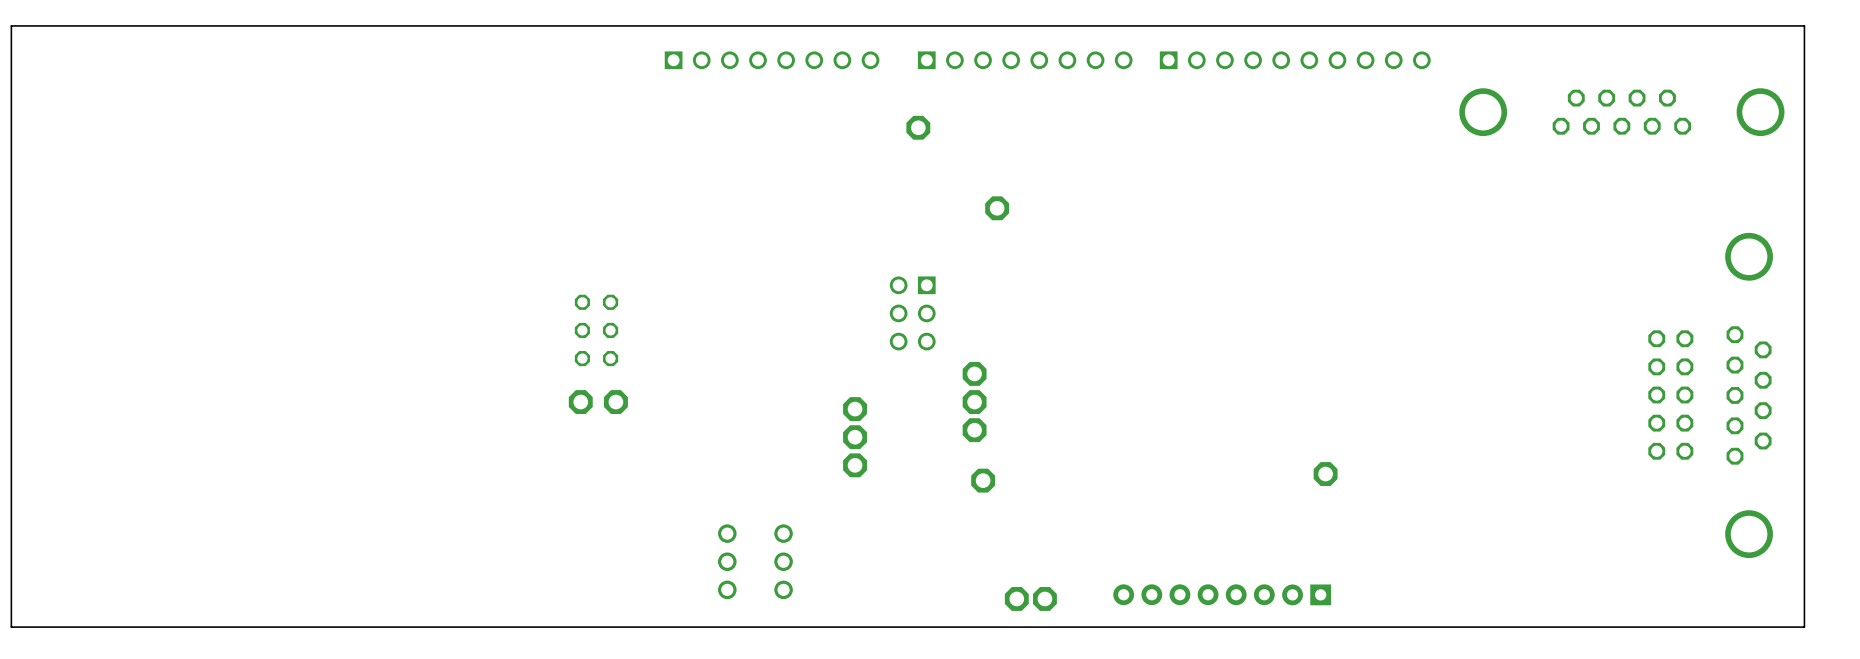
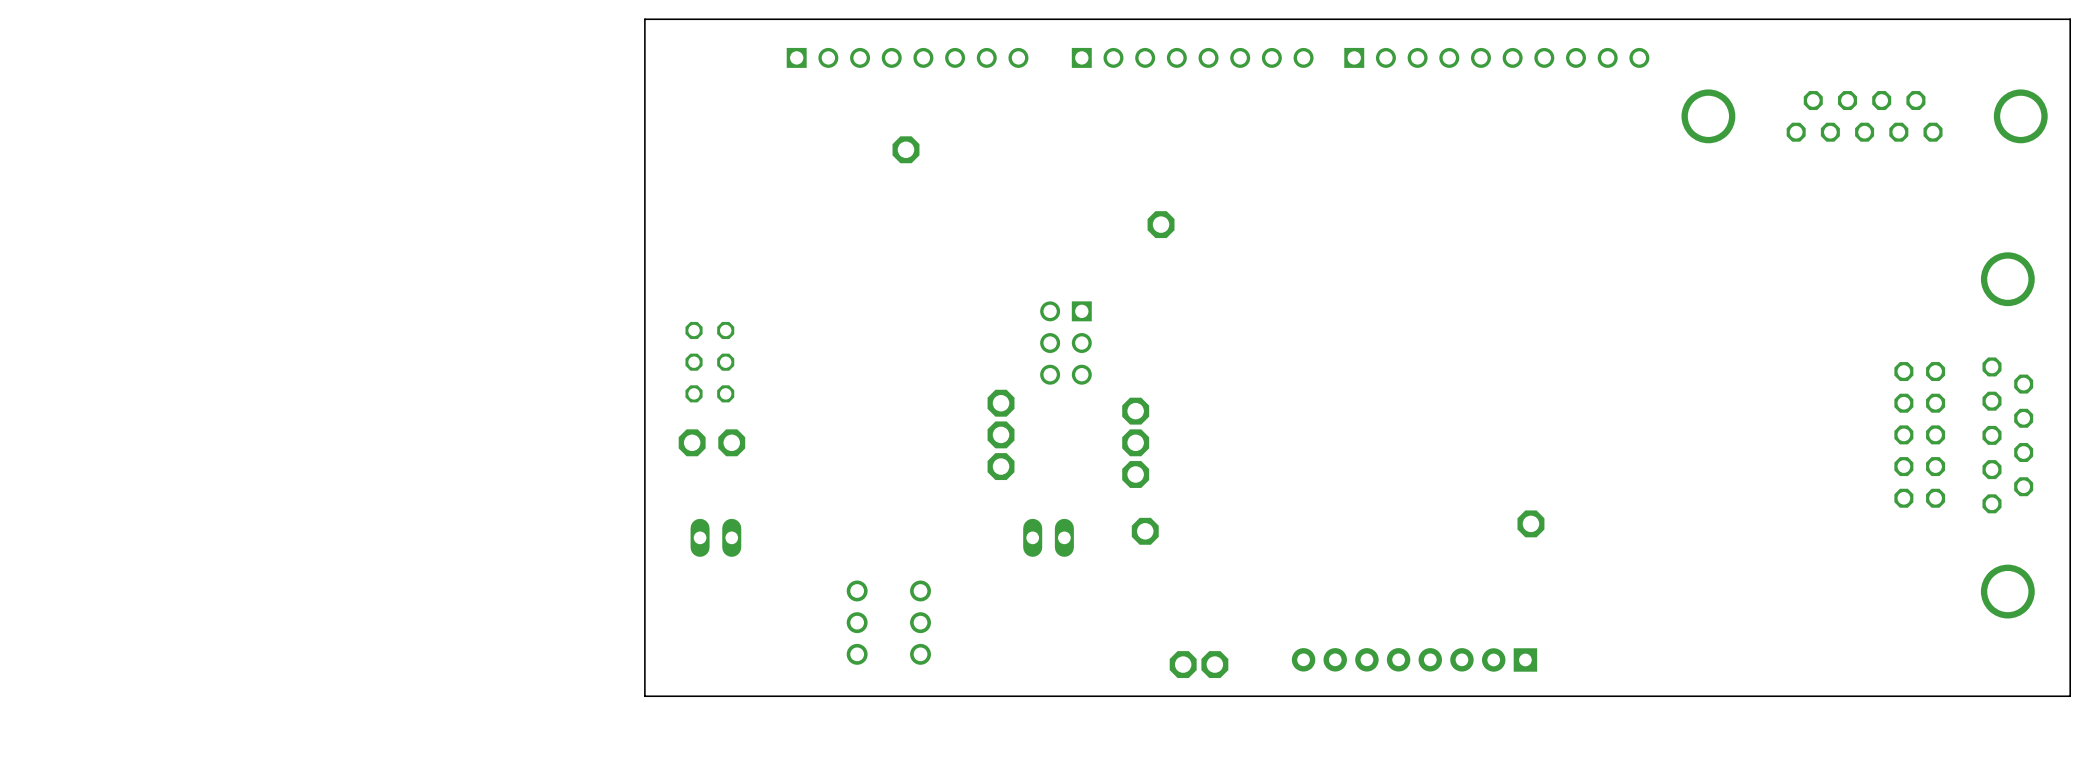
board edge: (538, 25) (11, 25) (11, 627) (538, 627) -> (644, 19) (644, 696)
part: (918, 127) -> none
part: none -> (905, 149)
part: none -> (1001, 403)
part: none -> (1001, 434)
part: (855, 409) -> none
part: none -> (1001, 466)
part: (855, 437) -> none
part: (855, 465) -> none
part: none -> (715, 537)
part: none -> (1048, 537)

